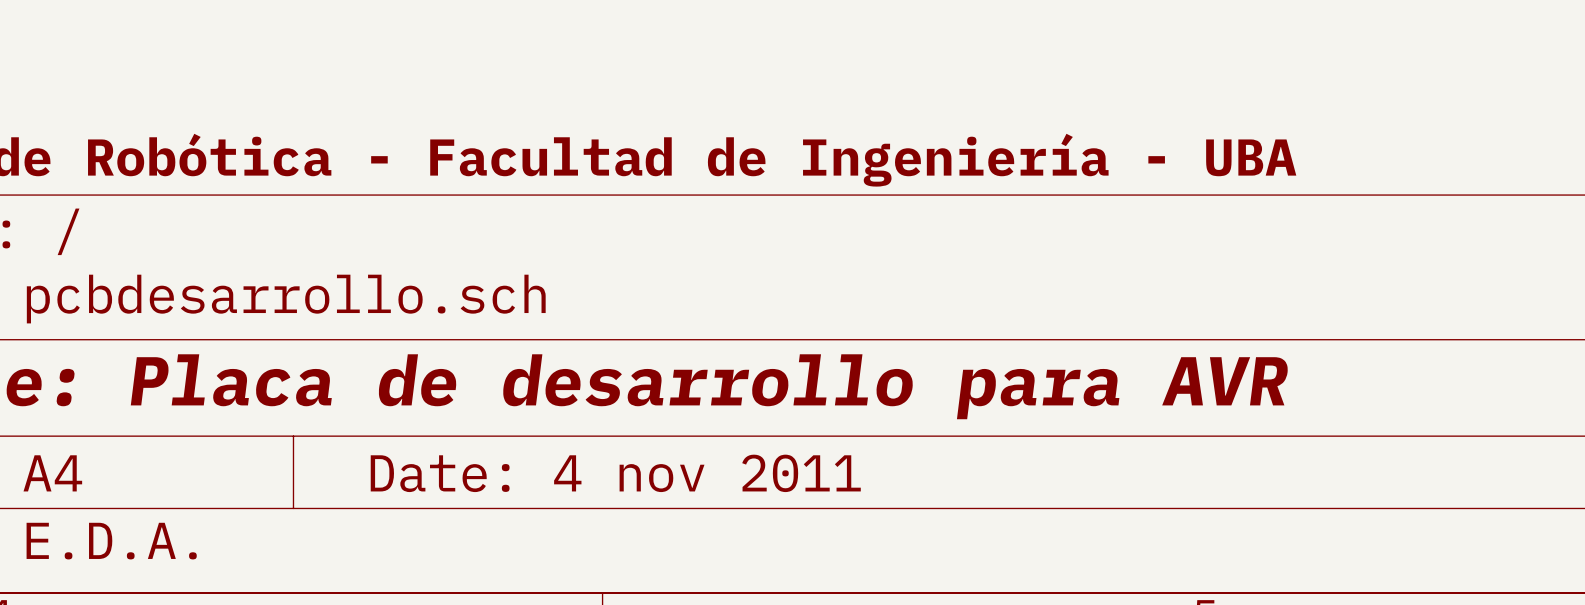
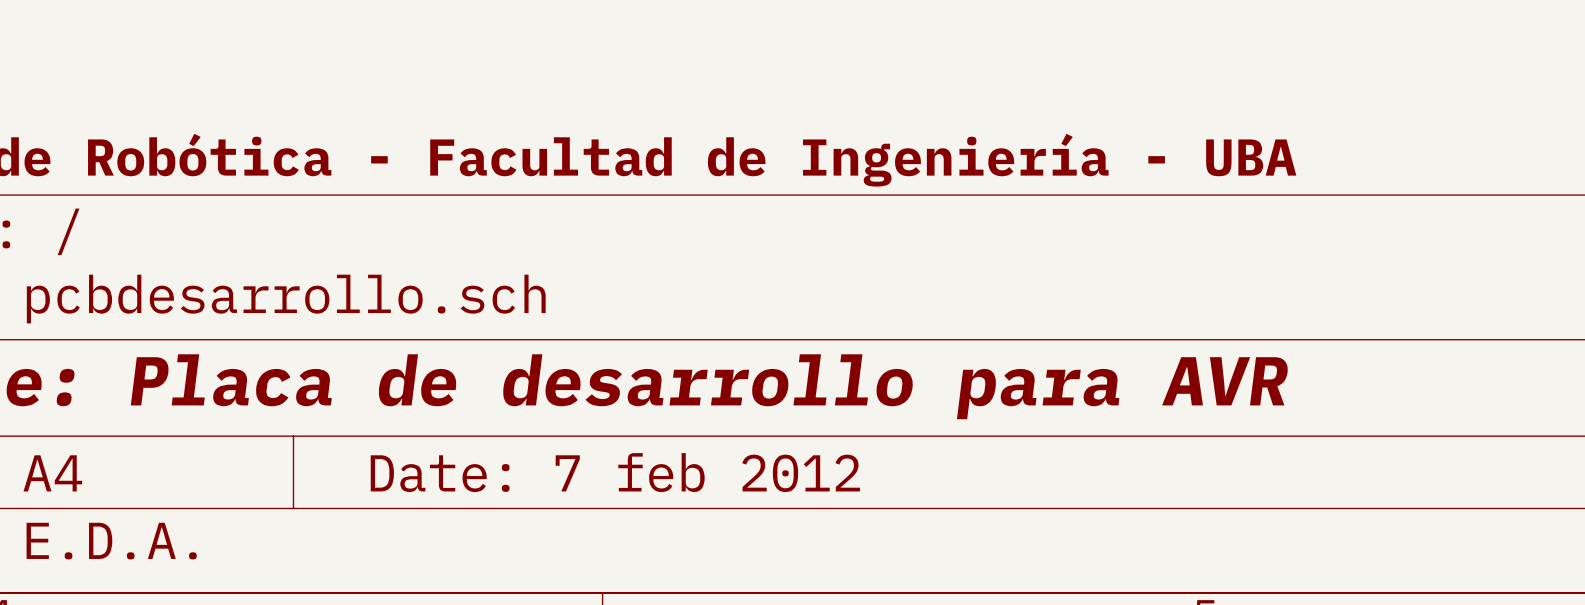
title block: Date: 4 nov 2011 (615, 473) -> Date: 7 feb 2012 (615, 472)

